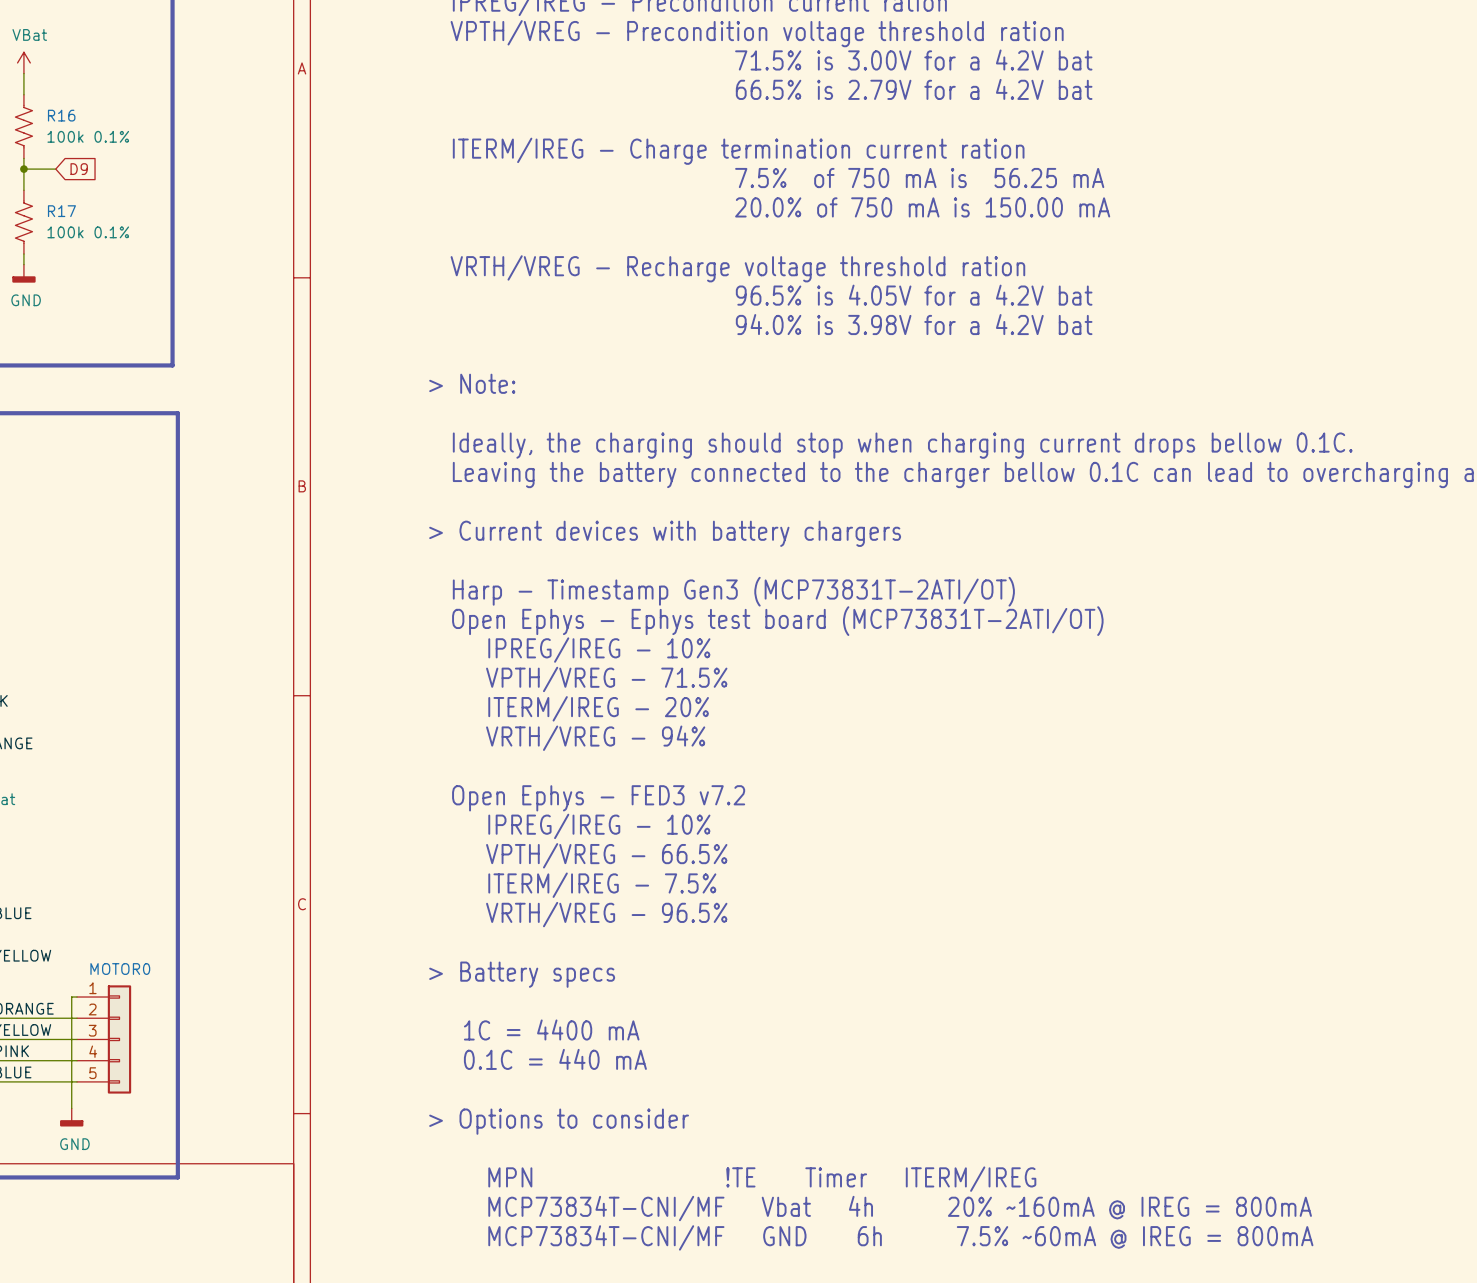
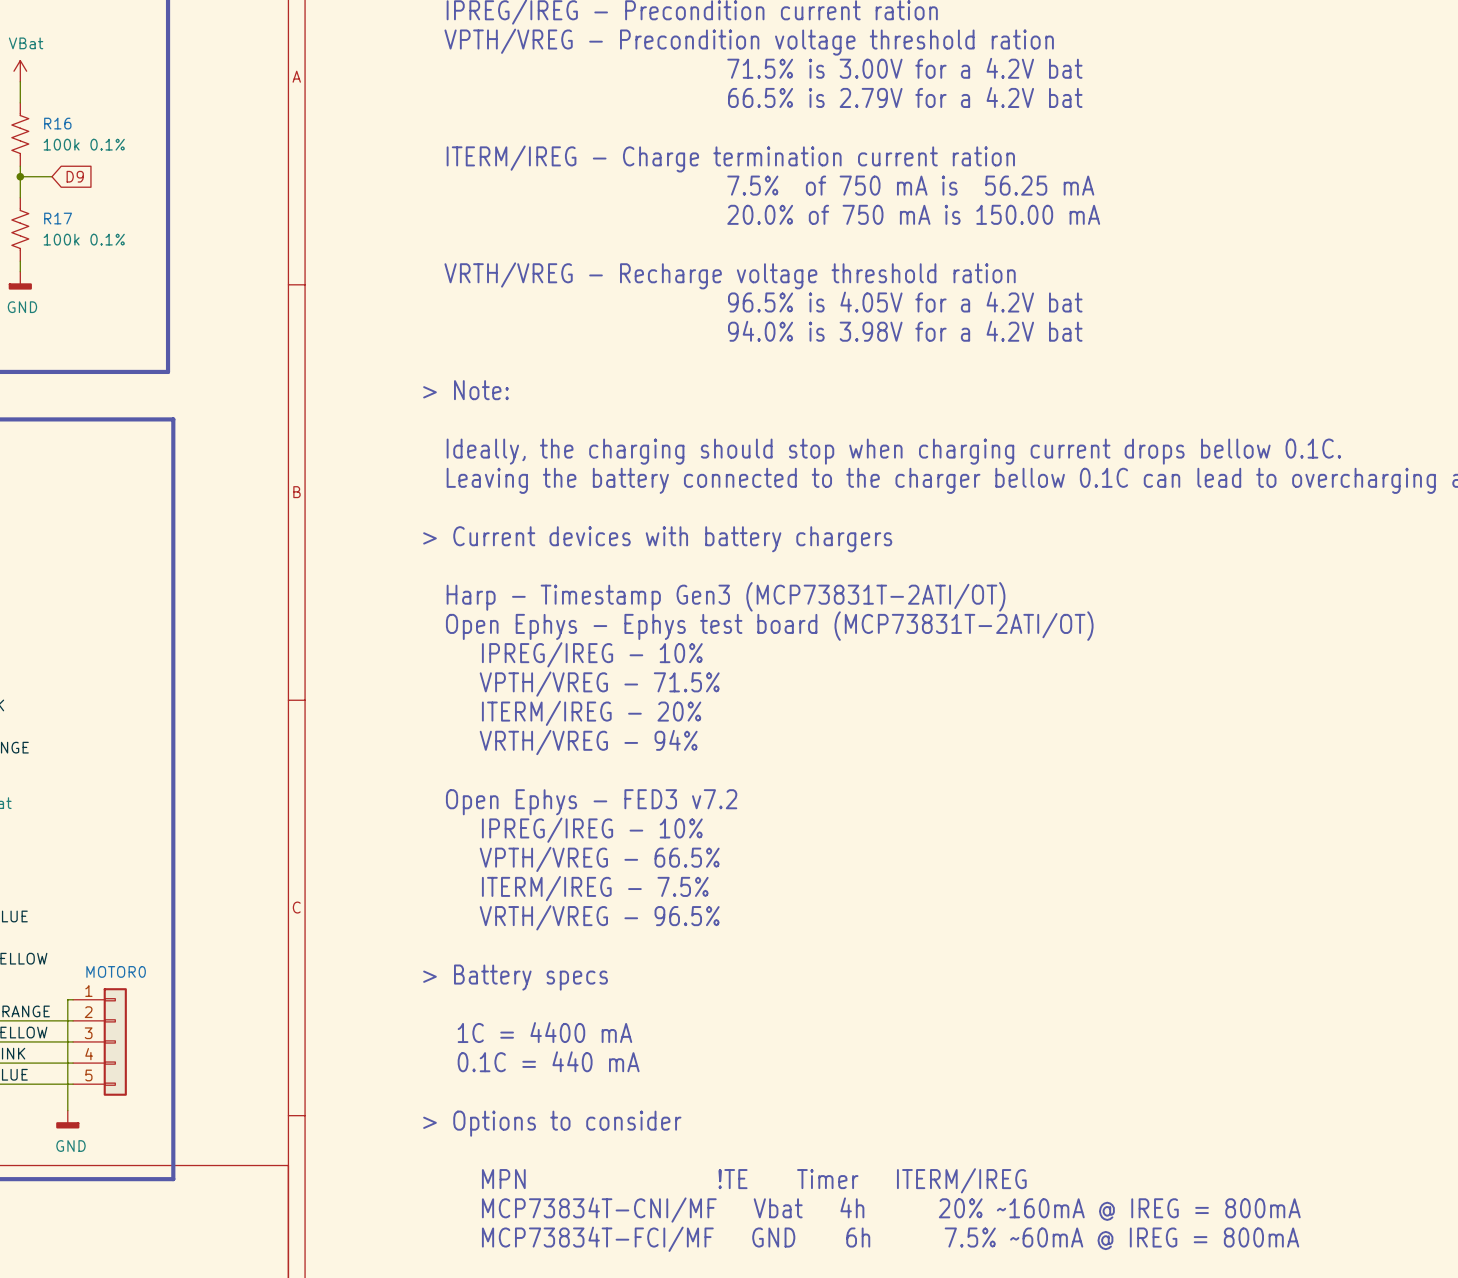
text: MCP73834T-CNI/MF GND 6h 7.5% ~60mA @ IREG = 800mA (900, 1237) -> MCP73834T-FCI/MF GND 6h 7.5% ~60mA @ IREG = 800mA (890, 1239)

